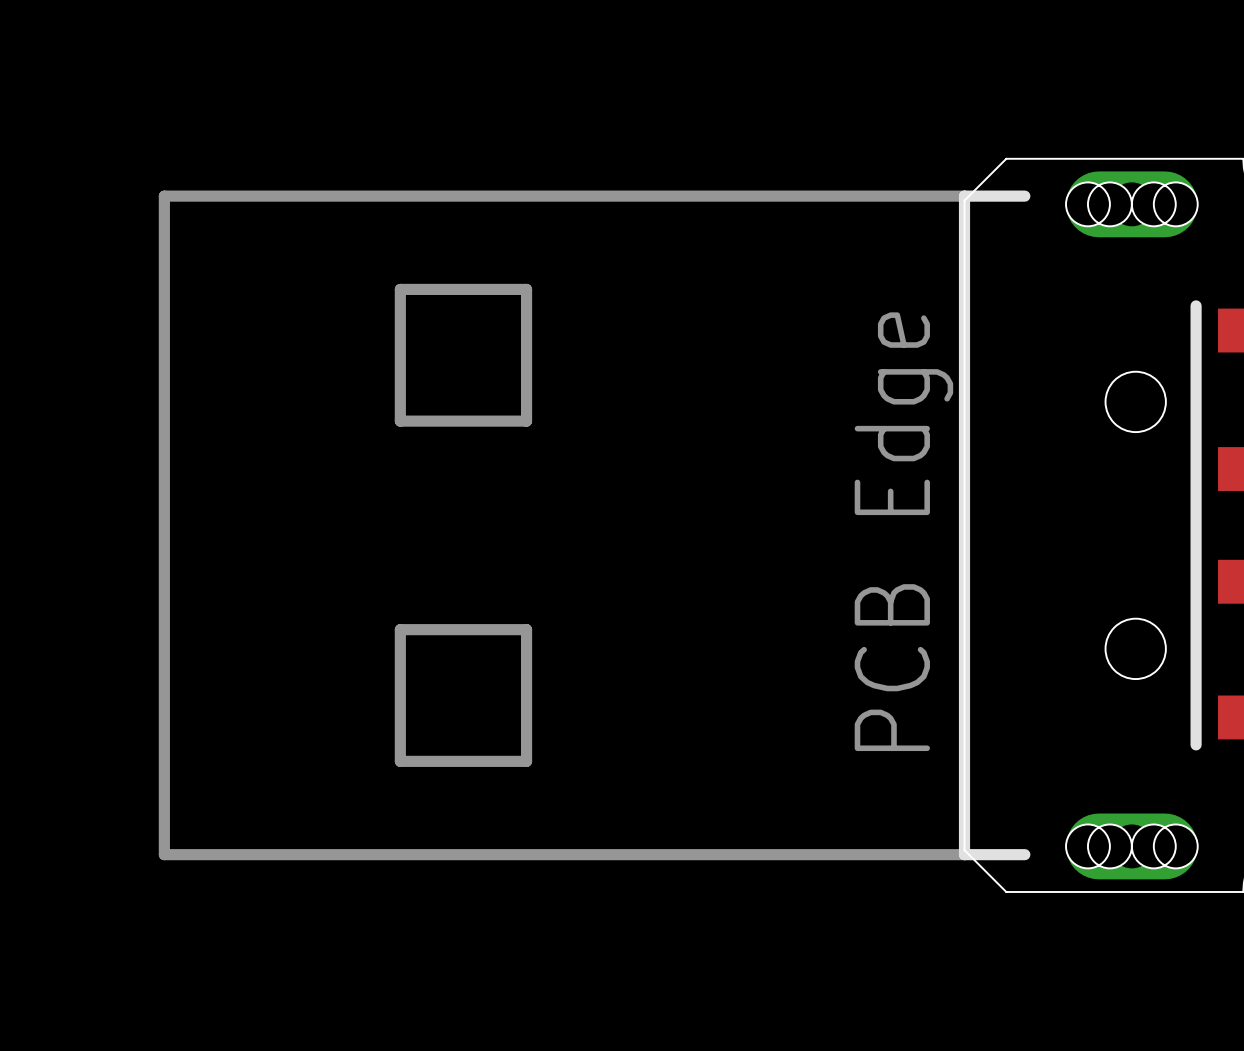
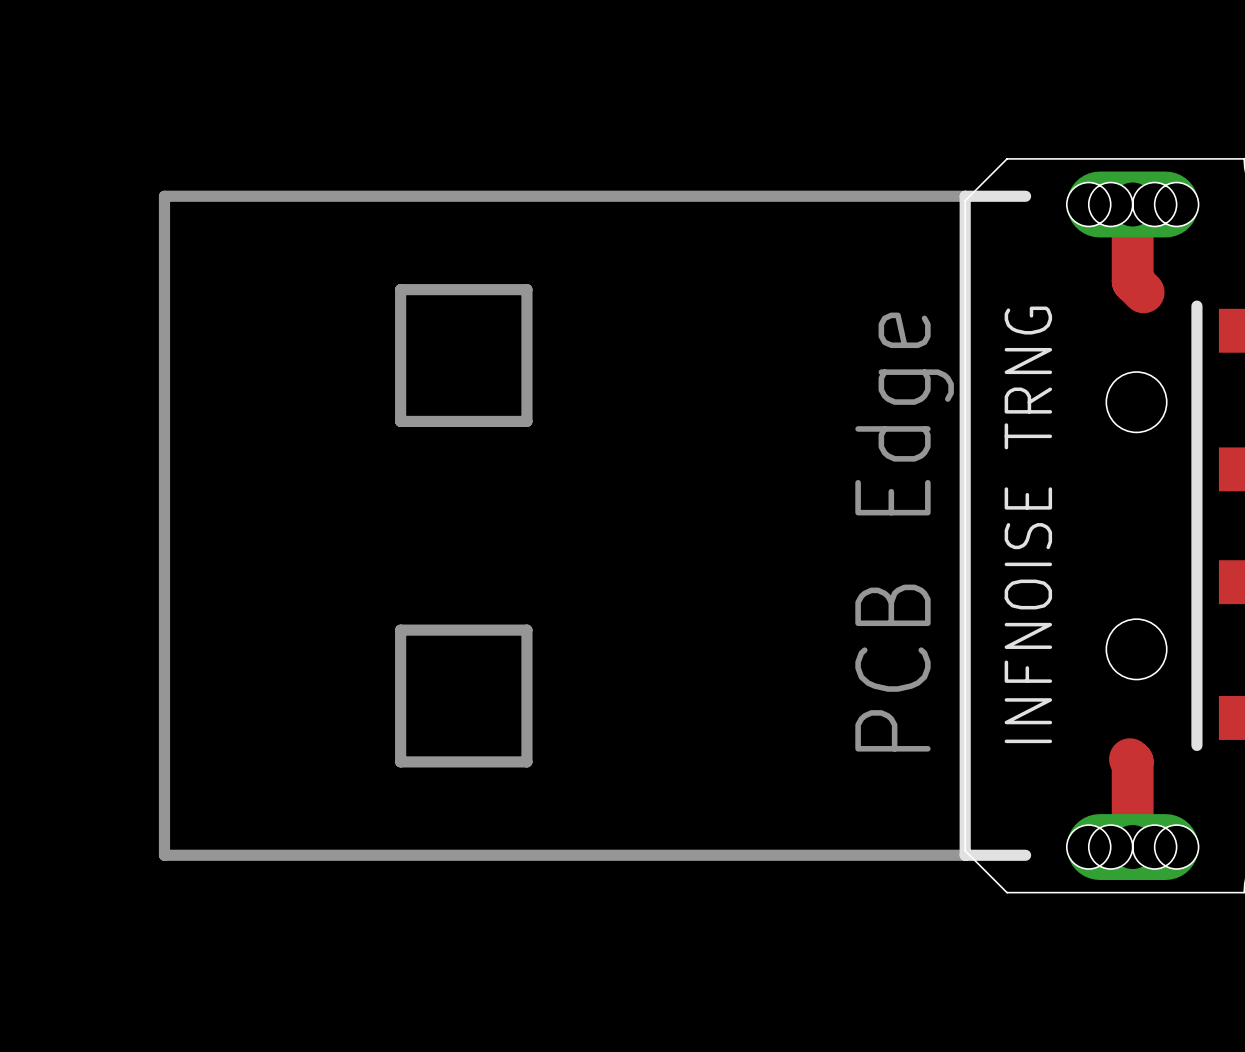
track: none -> (1132, 204) (1132, 281) (1143, 292)
text: none -> INFNOISE TRNG (1028, 524)
track: none -> (1129, 759) (1132, 761) (1132, 847)

